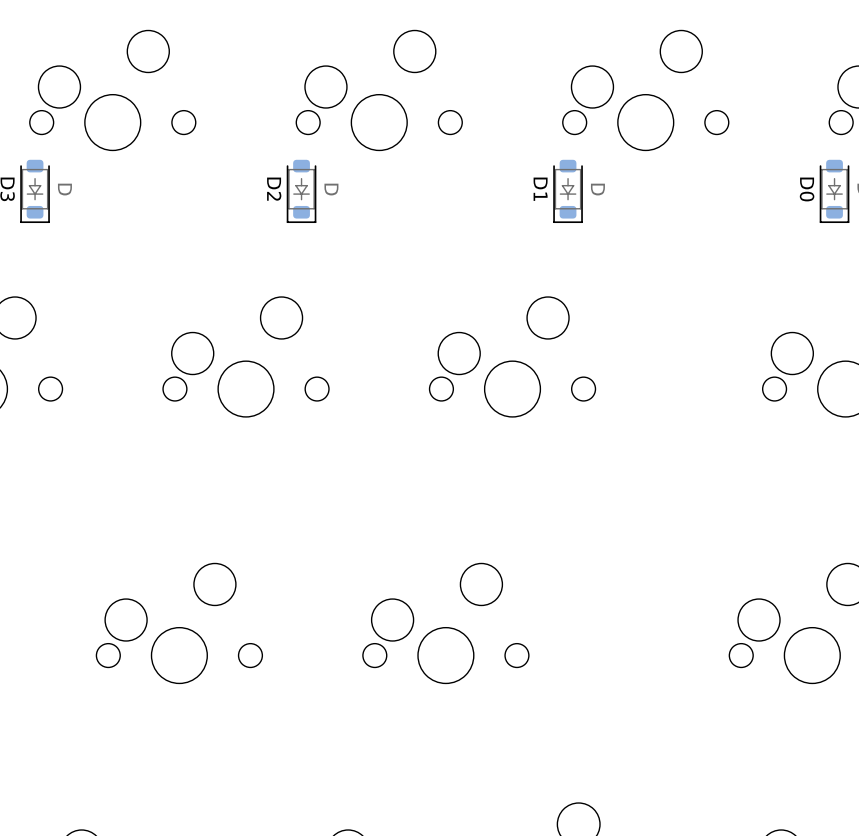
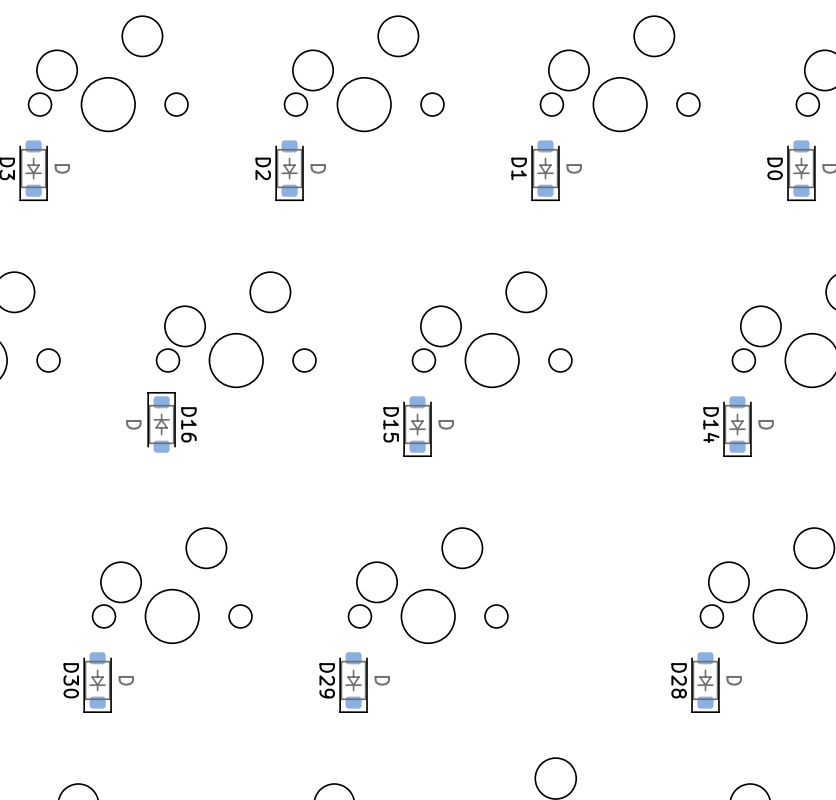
D16: none -> D (161, 422)
D15: none -> D (417, 426)
D14: none -> D (737, 426)
D30: none -> D (97, 682)
D29: none -> D (353, 682)
D28: none -> D (705, 682)

